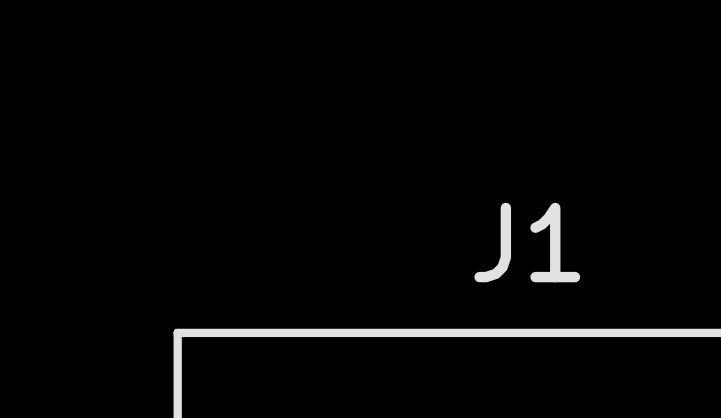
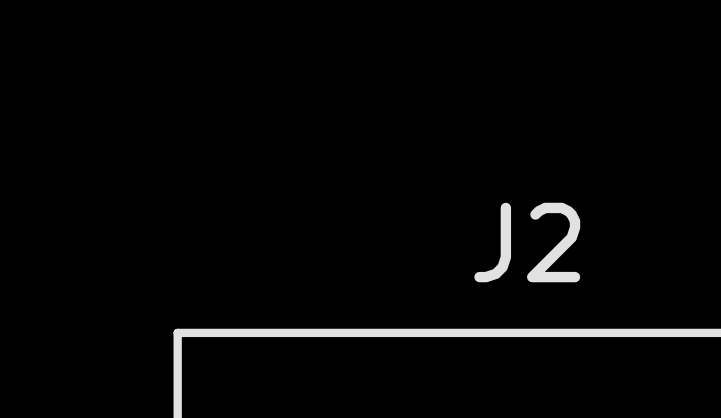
J1 name: J1 (527, 242) -> J2 (527, 242)

